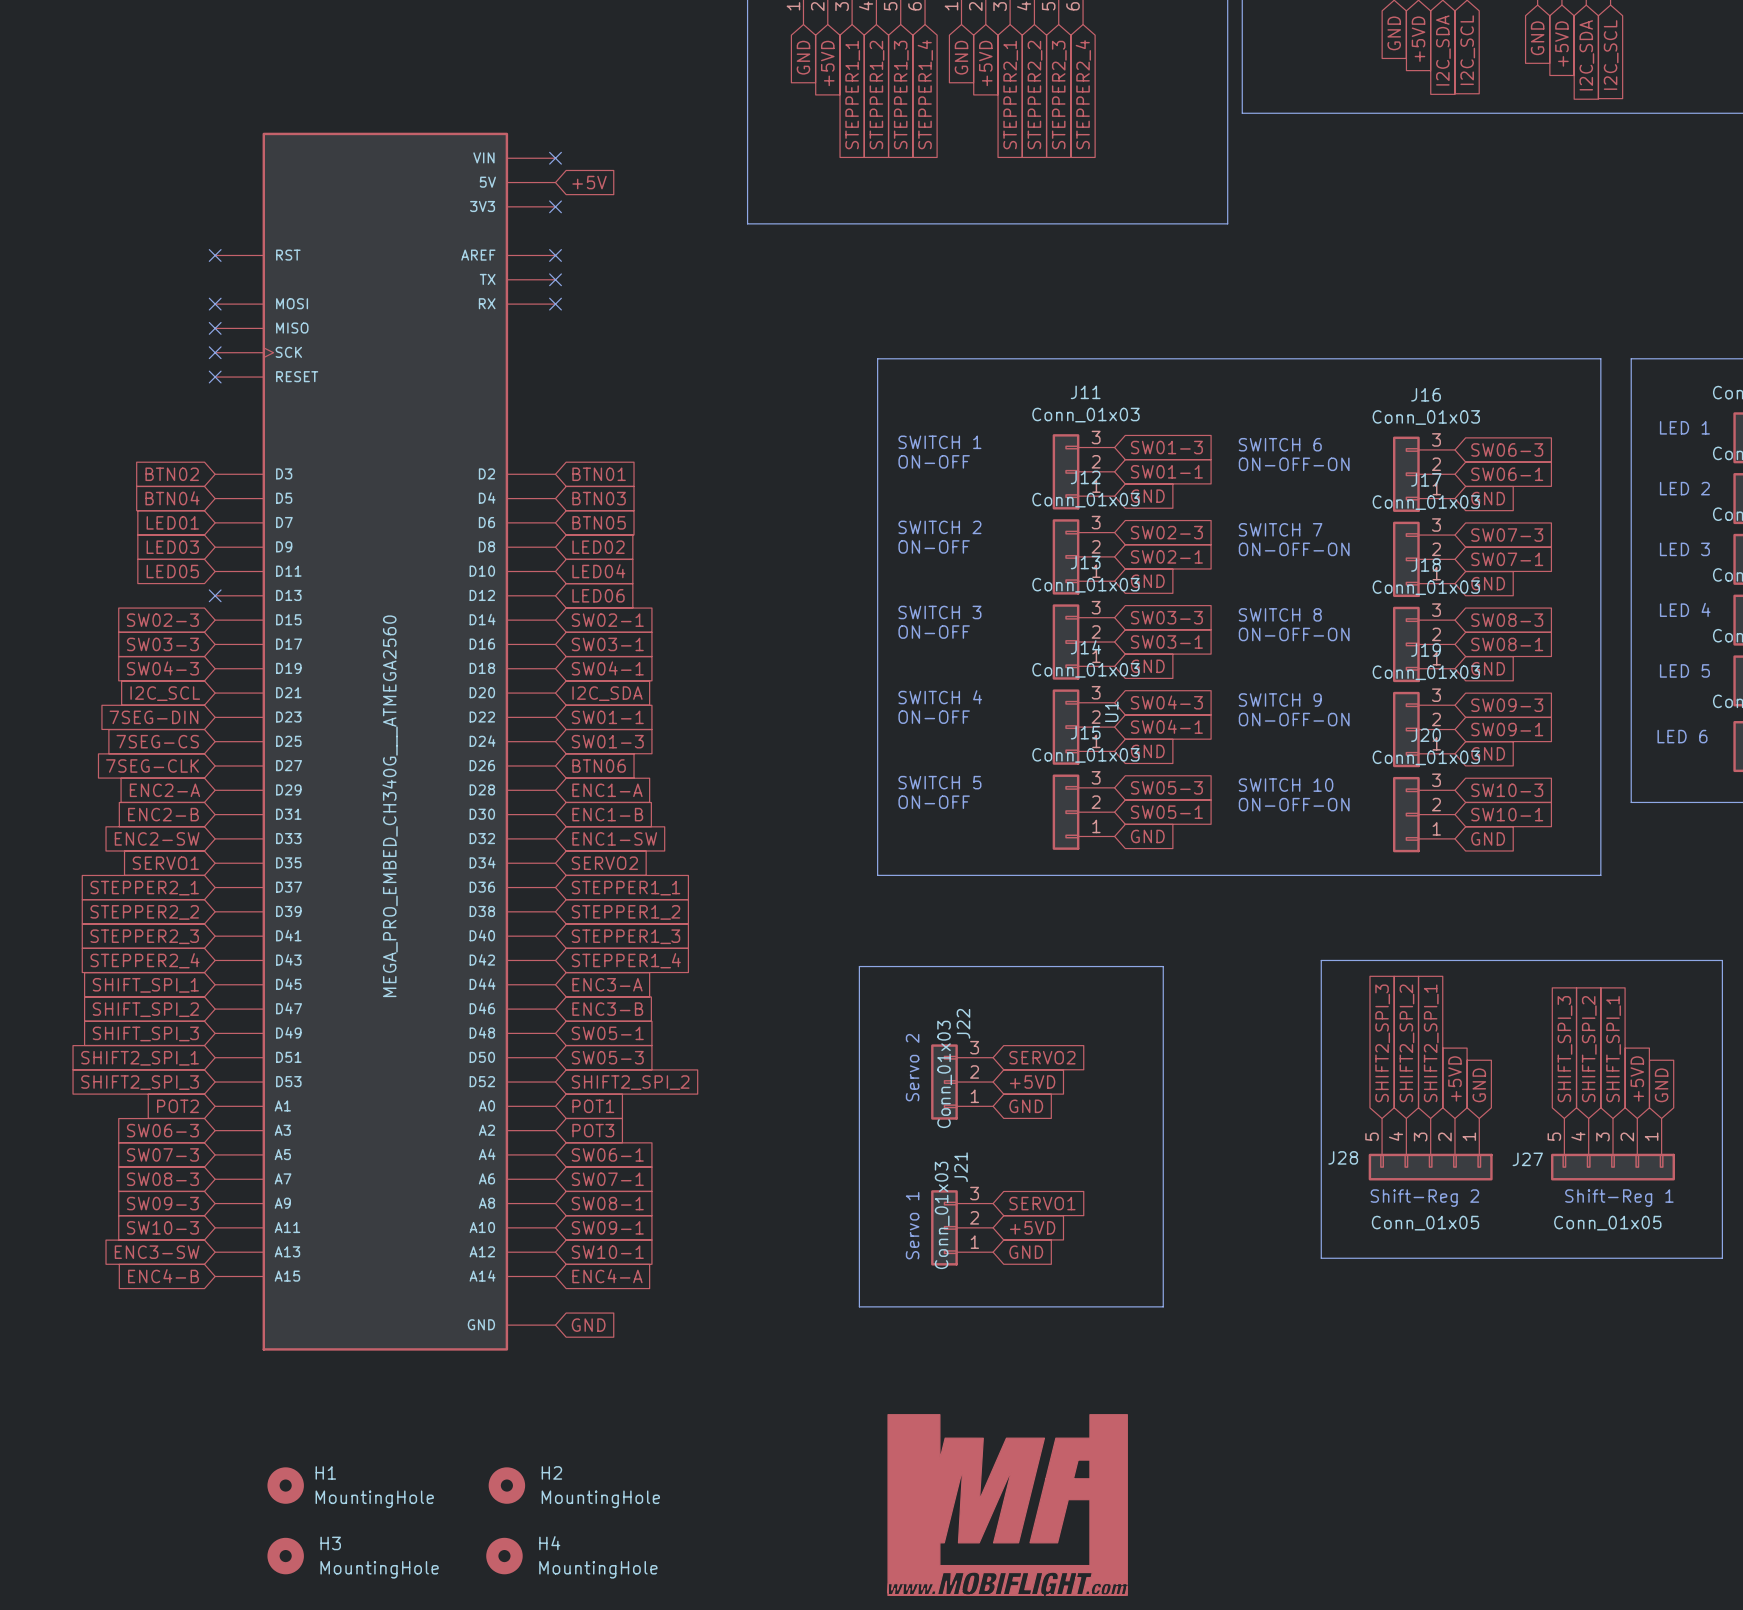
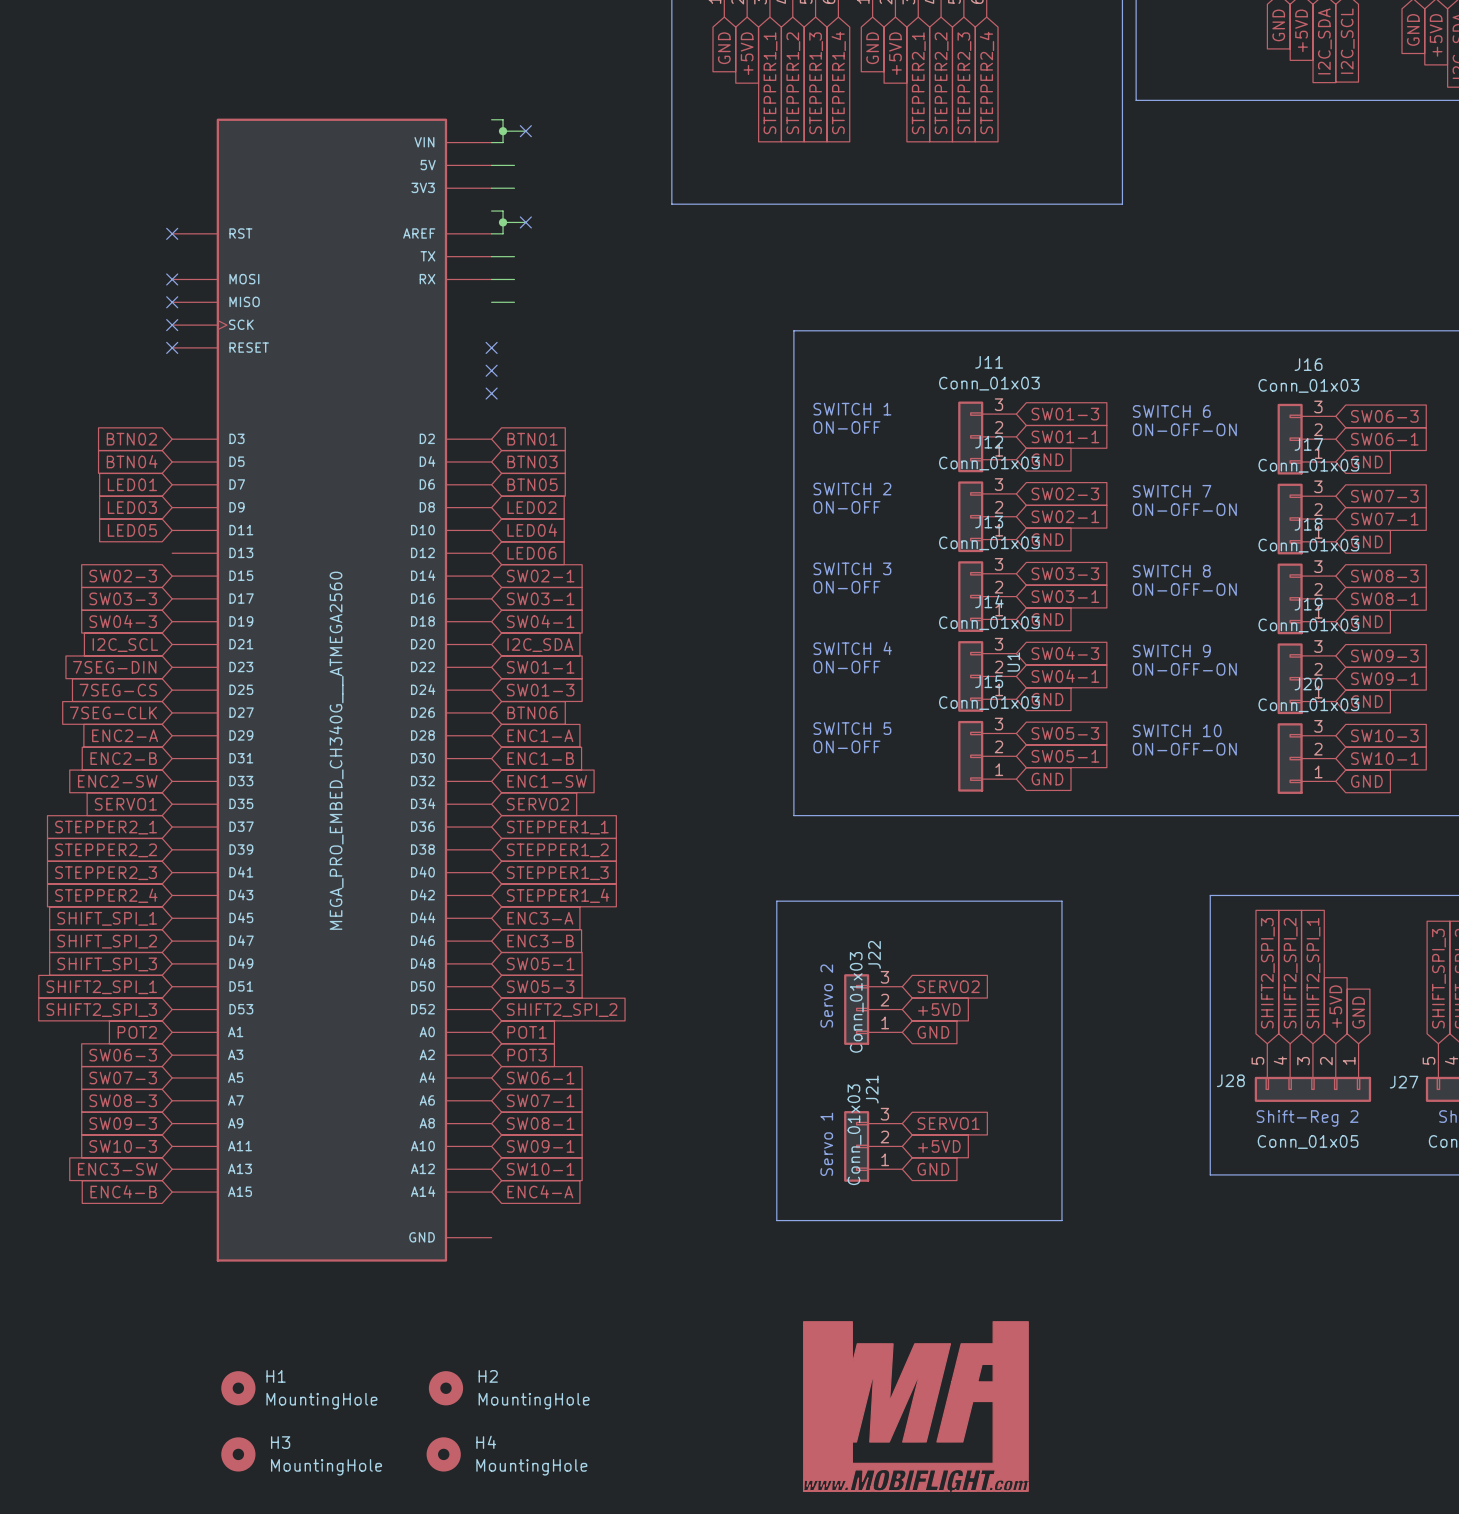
wire: none -> (491, 119) (503, 119) (503, 142) (491, 142)
wire: none -> (503, 131) (525, 131)
junction: none -> (503, 131)
no-connect mark: none -> (525, 131)
no-connect mark: (555, 158) -> none
wire: none -> (491, 165) (514, 165)
global label: +5V (589, 182) -> none
wire: none -> (491, 188) (514, 188)
no-connect mark: (555, 206) -> none
wire: none -> (491, 211) (503, 211) (503, 233) (491, 233)
wire: none -> (503, 222) (525, 222)
junction: none -> (503, 222)
no-connect mark: none -> (525, 222)
no-connect mark: (555, 255) -> none
wire: none -> (491, 256) (514, 256)
no-connect mark: (555, 279) -> none
wire: none -> (491, 279) (514, 279)
no-connect mark: (555, 304) -> none
wire: none -> (491, 302) (514, 302)
no-connect mark: none -> (491, 347)
no-connect mark: none -> (491, 370)
no-connect mark: none -> (491, 393)
no-connect mark: (215, 595) -> none
global label: GND (588, 1325) -> none

